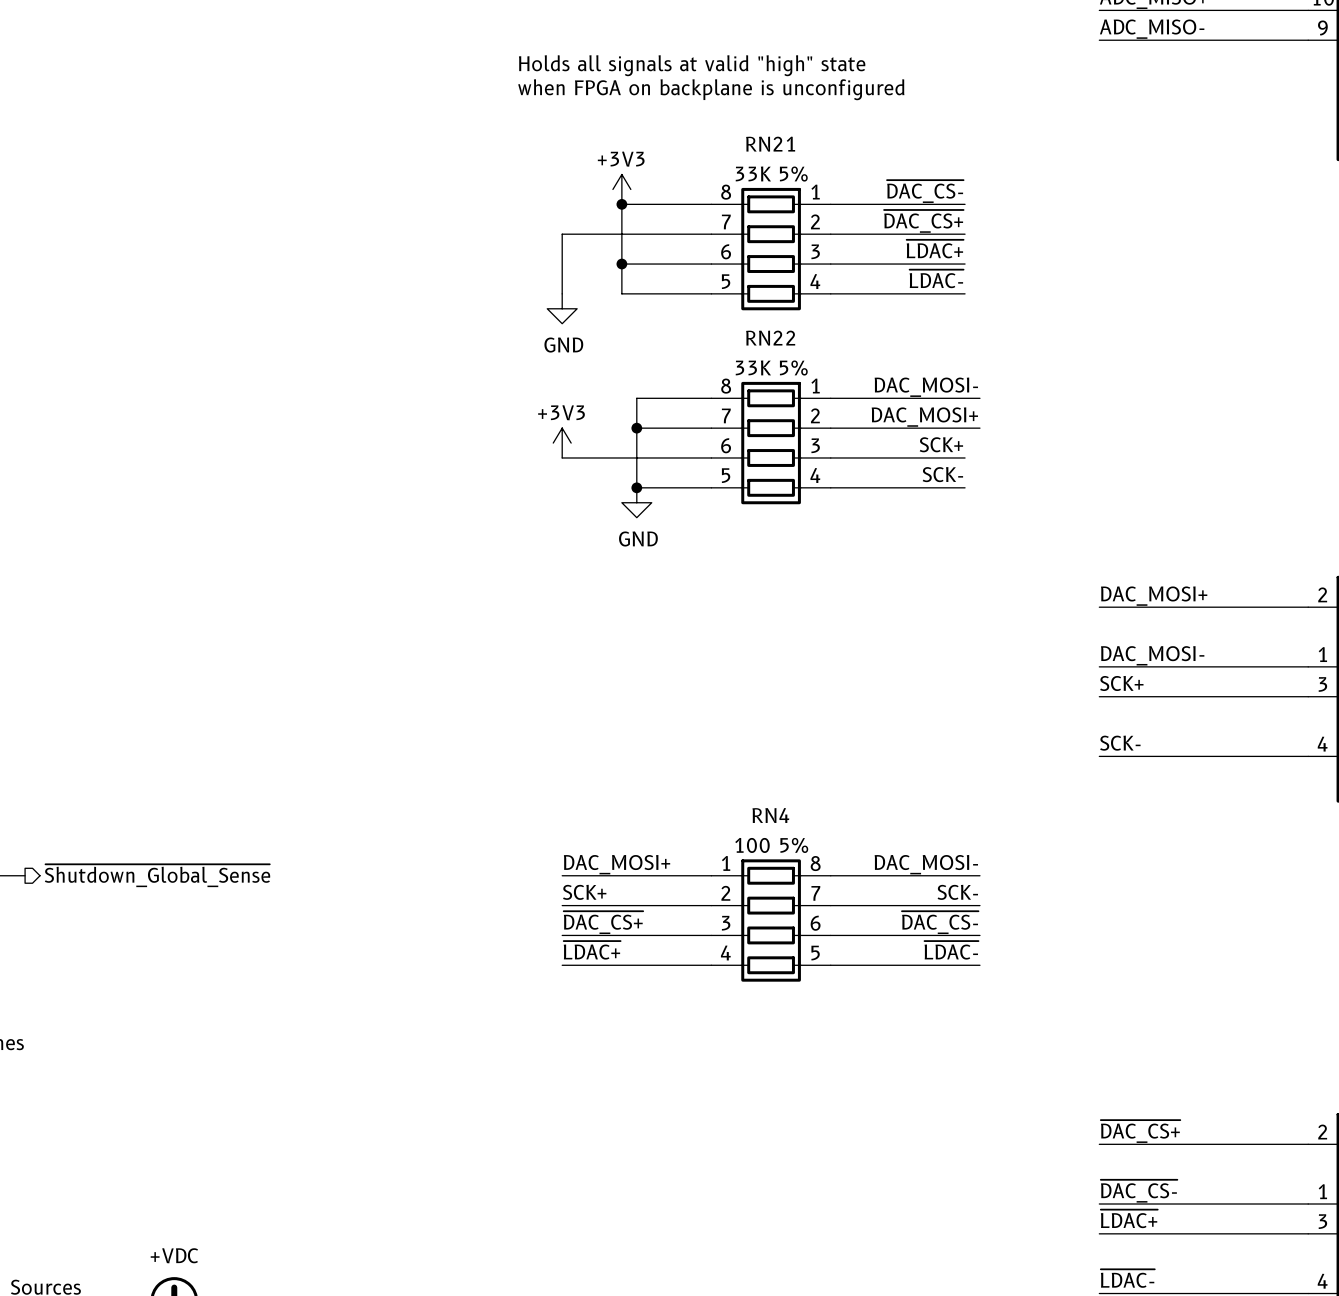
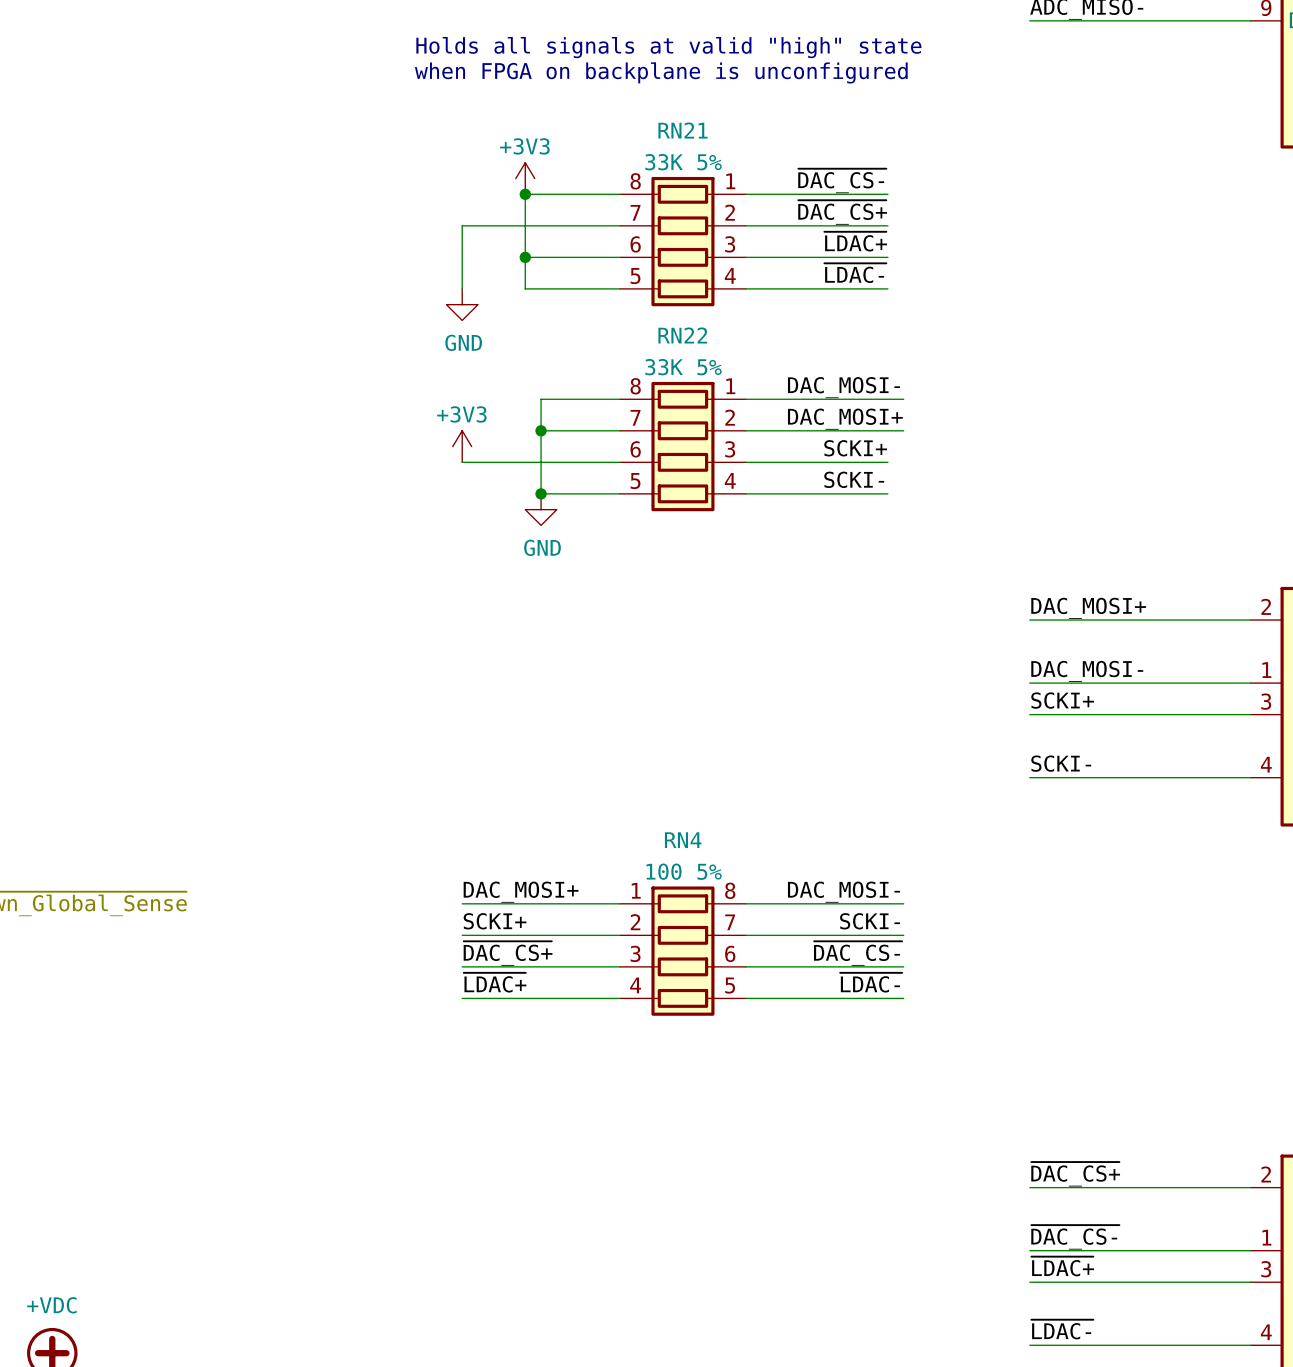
label: SCK+ (941, 444) -> SCKI+ (855, 448)
label: SCK- (942, 474) -> SCKI- (854, 479)
label: SCK+ (1121, 683) -> SCKI+ (1062, 700)
label: SCK- (1120, 743) -> SCKI- (1061, 763)
label: SCK+ (584, 892) -> SCKI+ (495, 921)
label: SCK- (957, 892) -> SCKI- (869, 921)

